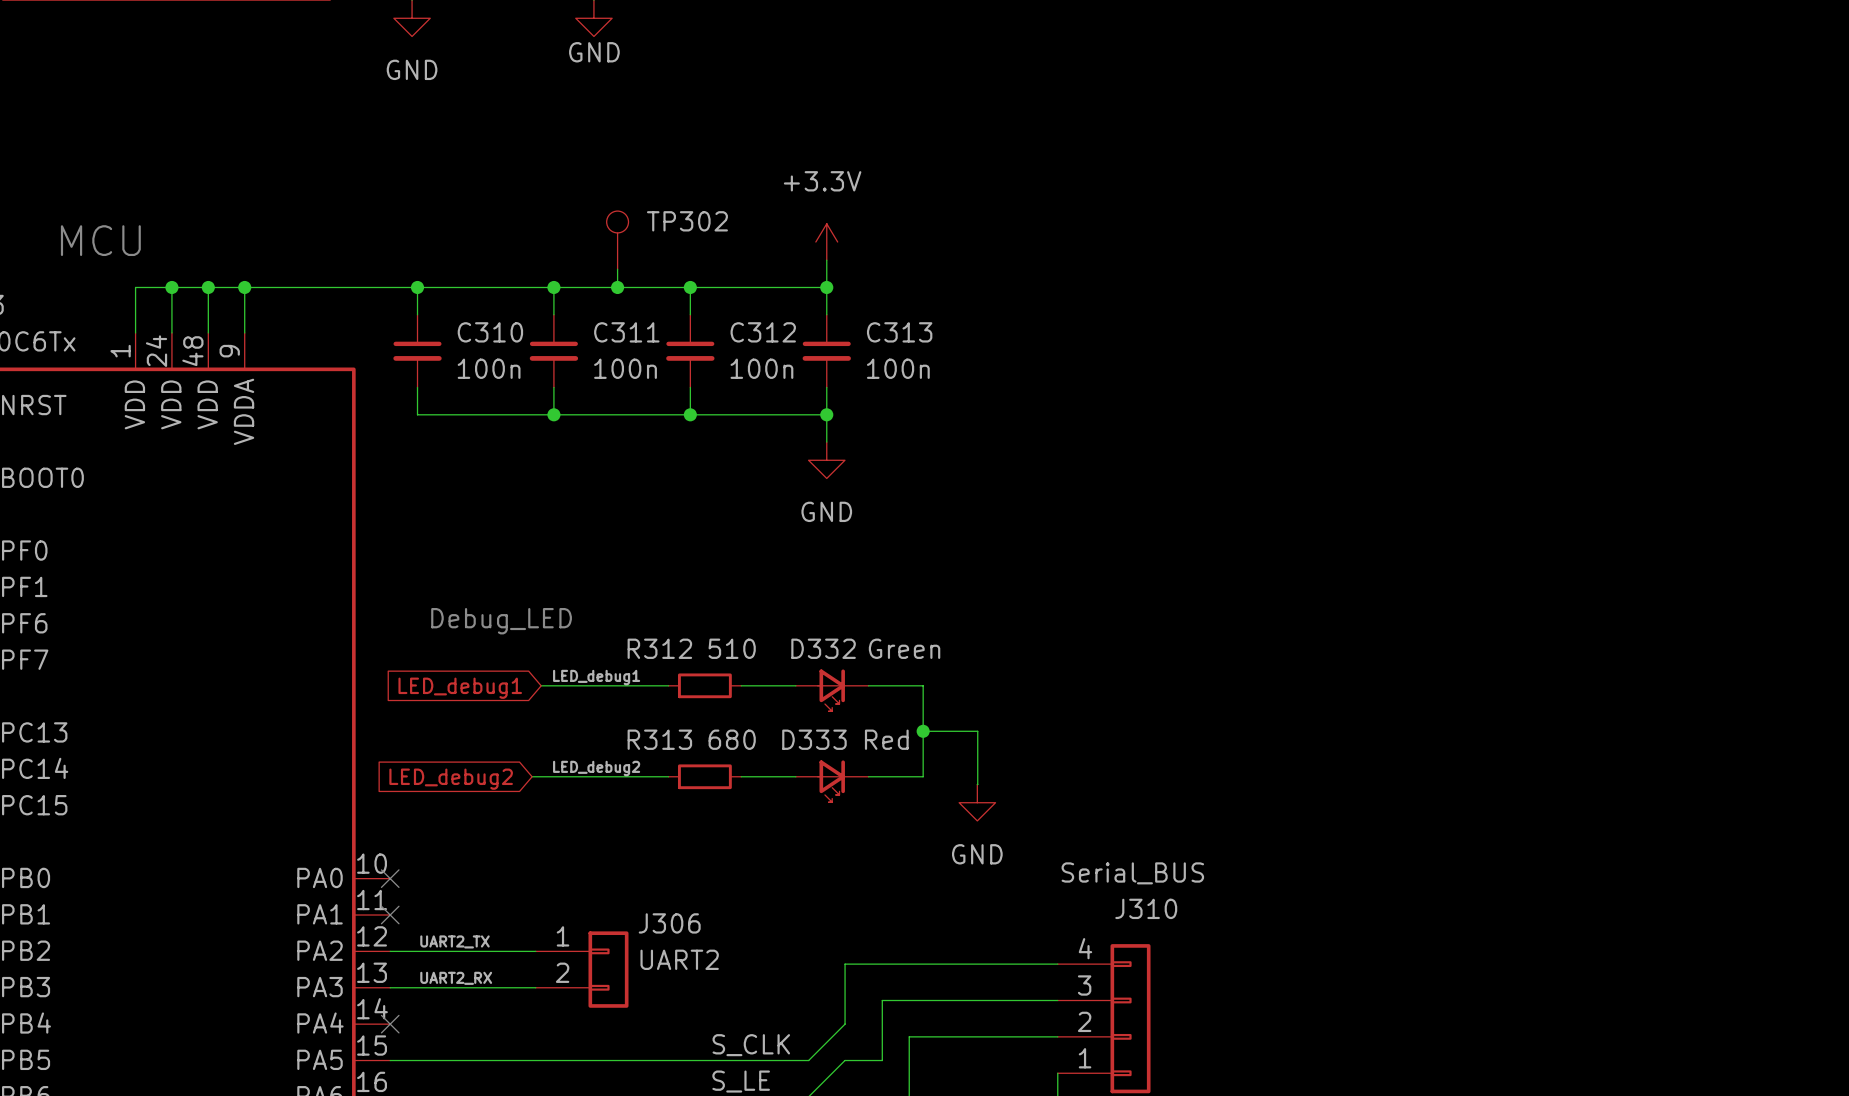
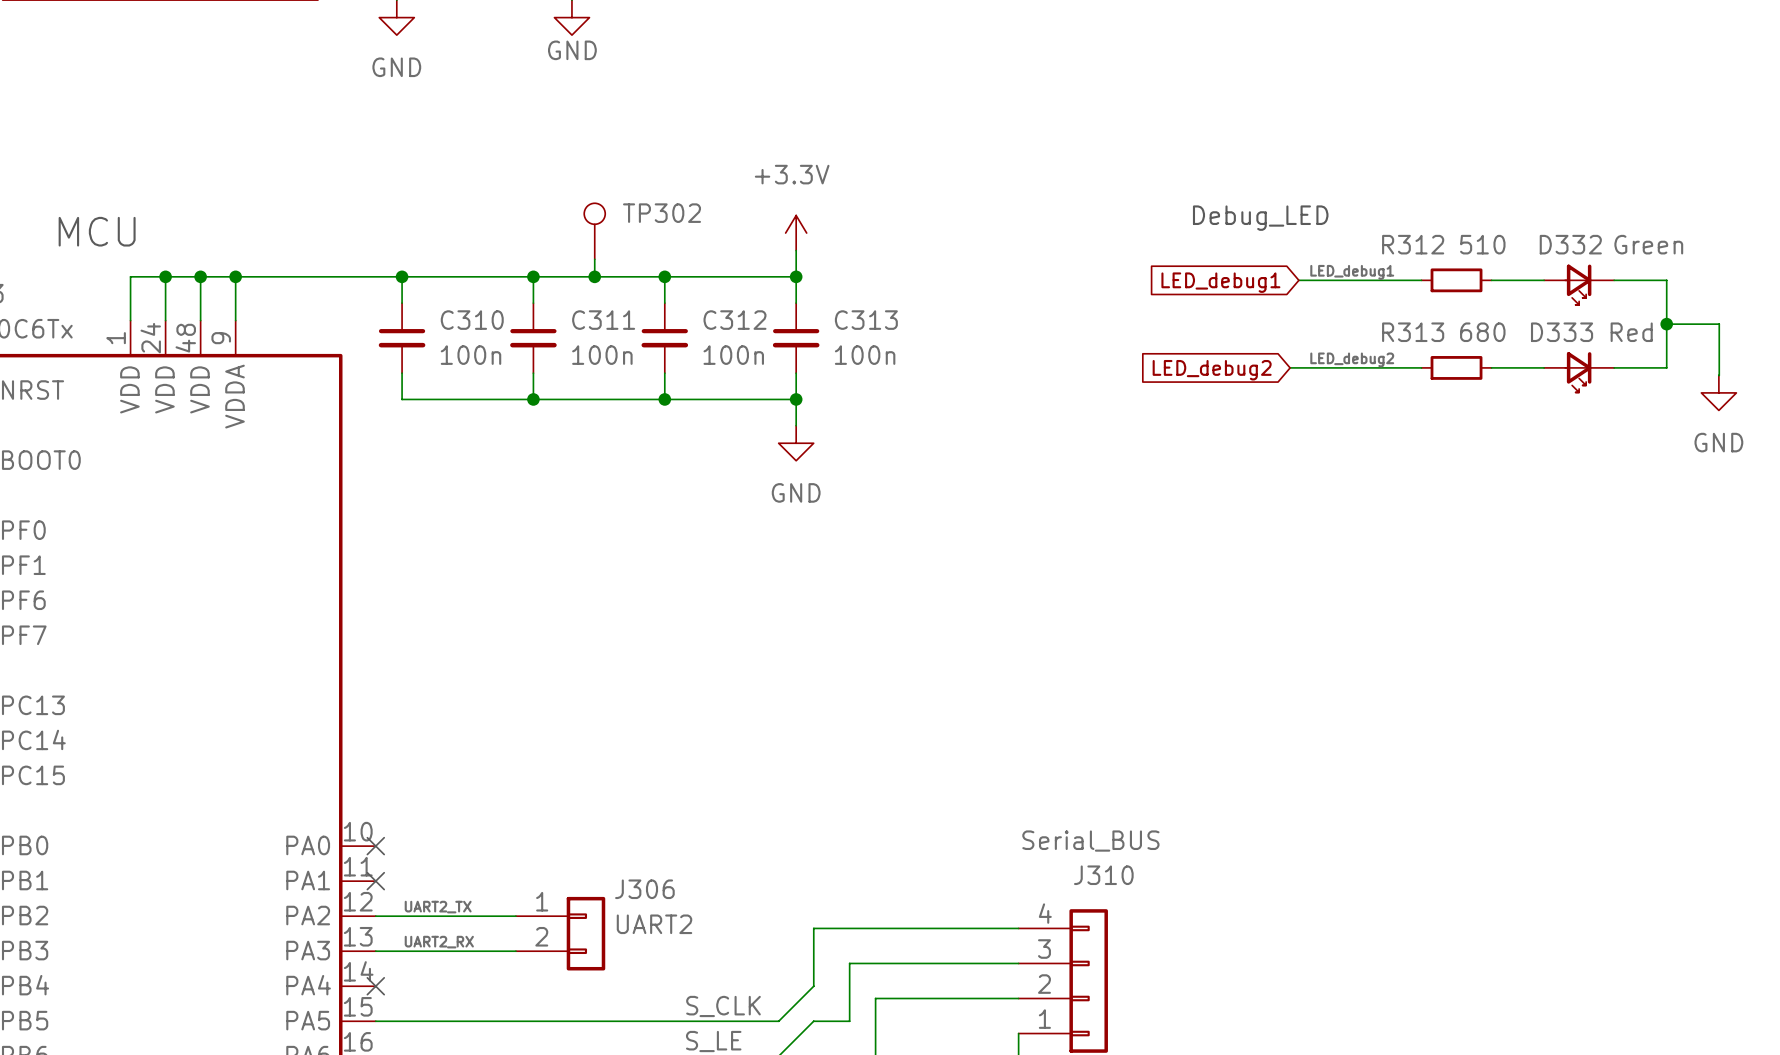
text: none -> Debug_LED (1260, 218)
label: none -> LED_debug1 (1352, 272)
wire: none -> (1298, 280) (1421, 280)
wire: none -> (1491, 280) (1544, 280)
wire: none -> (1614, 280) (1666, 280) (1666, 367) (1614, 367)
global label: none -> LED_debug1 (1220, 282)
wire: none -> (1666, 324) (1719, 324) (1718, 375)
junction: none -> (1666, 324)
label: none -> LED_debug2 (1352, 359)
wire: none -> (1290, 367) (1421, 367)
wire: none -> (1491, 367) (1544, 367)
global label: none -> LED_debug2 (1212, 370)
power symbol: none -> GND (1718, 392)
text: Debug_LED (501, 621) -> none
label: LED_debug1 (596, 677) -> none
wire: (541, 685) (668, 685) -> none
R312 position: (704, 685) -> (1456, 280)
wire: (741, 685) (795, 685) -> none
wire: (868, 685) (923, 685) (923, 776) (868, 776) -> none
global label: LED_debug1 (460, 688) -> none
D332 position: (832, 690) -> (1579, 284)
wire: (923, 731) (977, 731) (977, 784) -> none
junction: (923, 731) -> none
label: LED_debug2 (596, 768) -> none
wire: (532, 776) (668, 776) -> none
R313 position: (704, 776) -> (1456, 367)
wire: (741, 776) (795, 776) -> none
global label: LED_debug2 (451, 779) -> none
D333 position: (832, 781) -> (1579, 372)
power symbol: GND (977, 802) -> none

